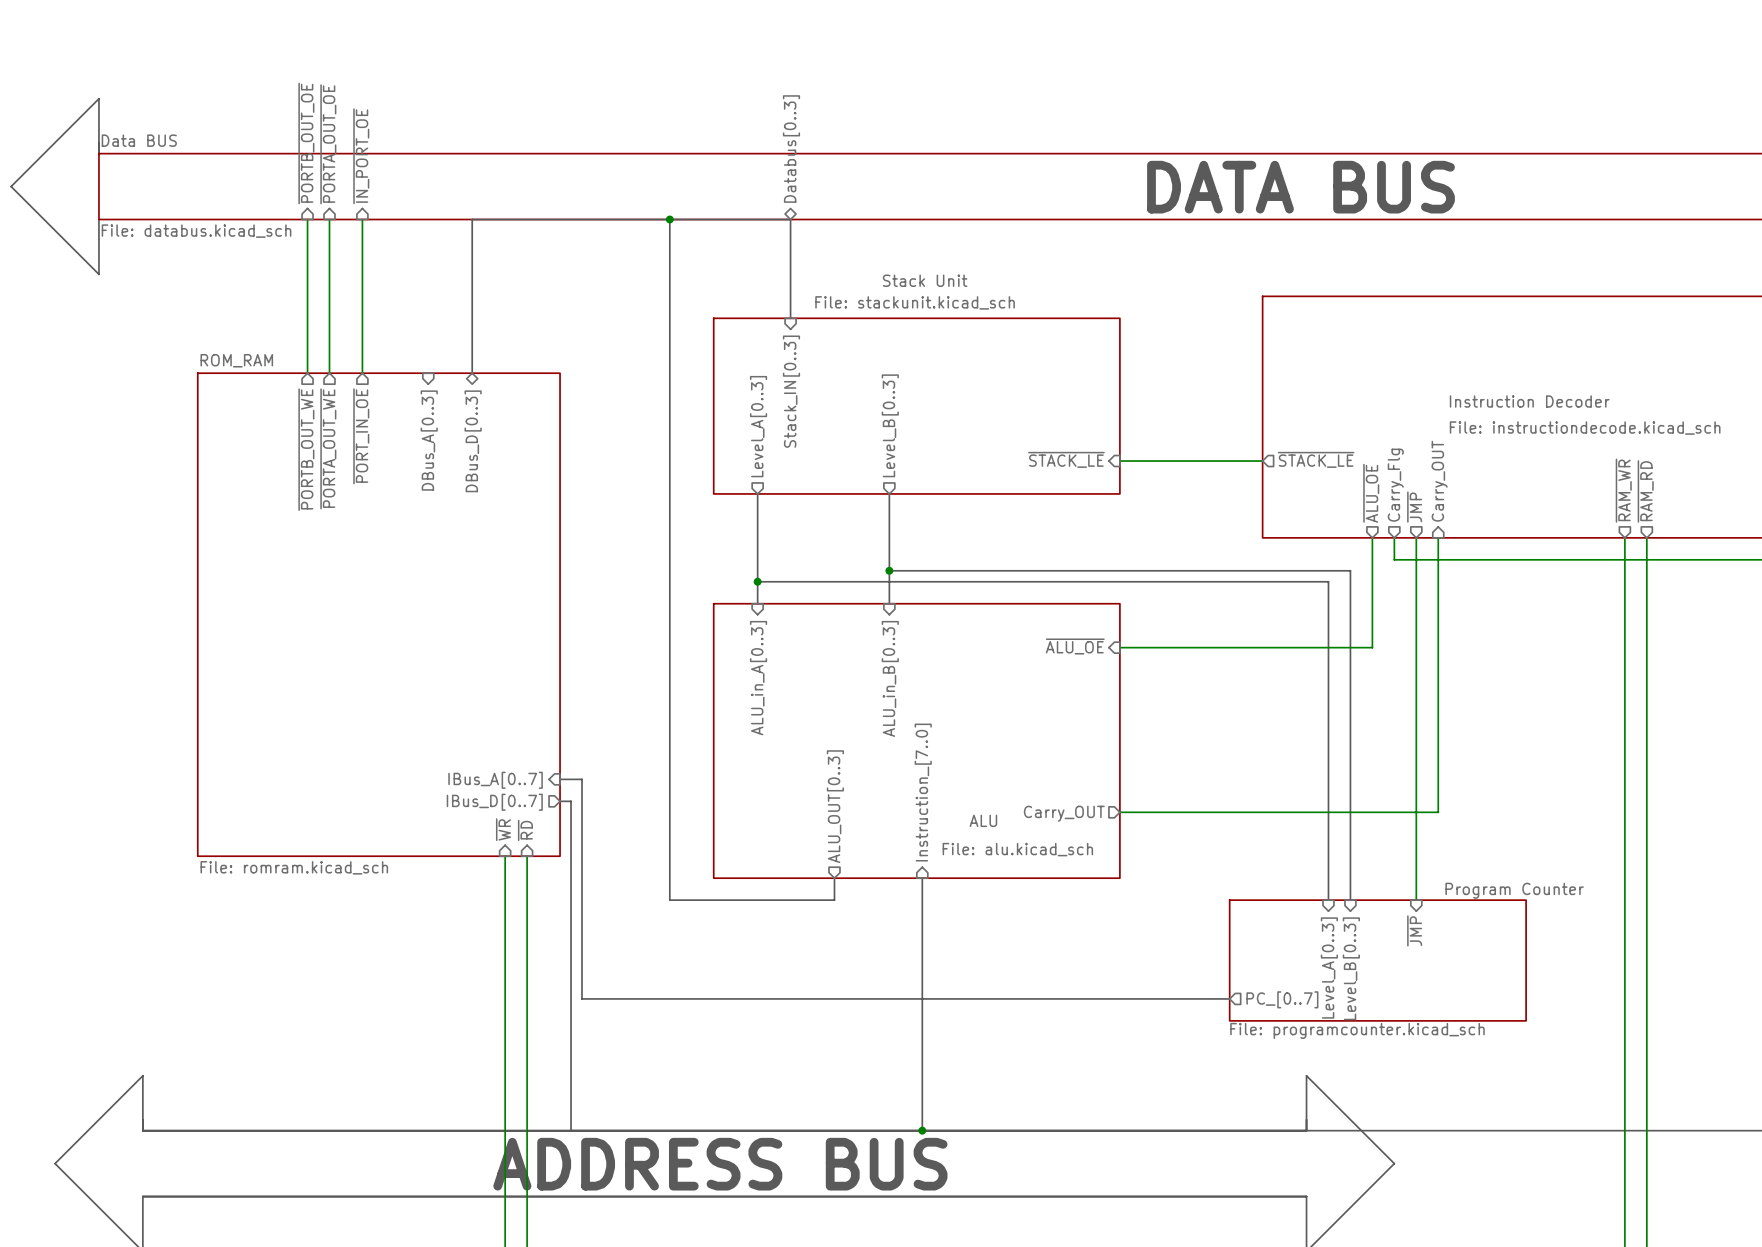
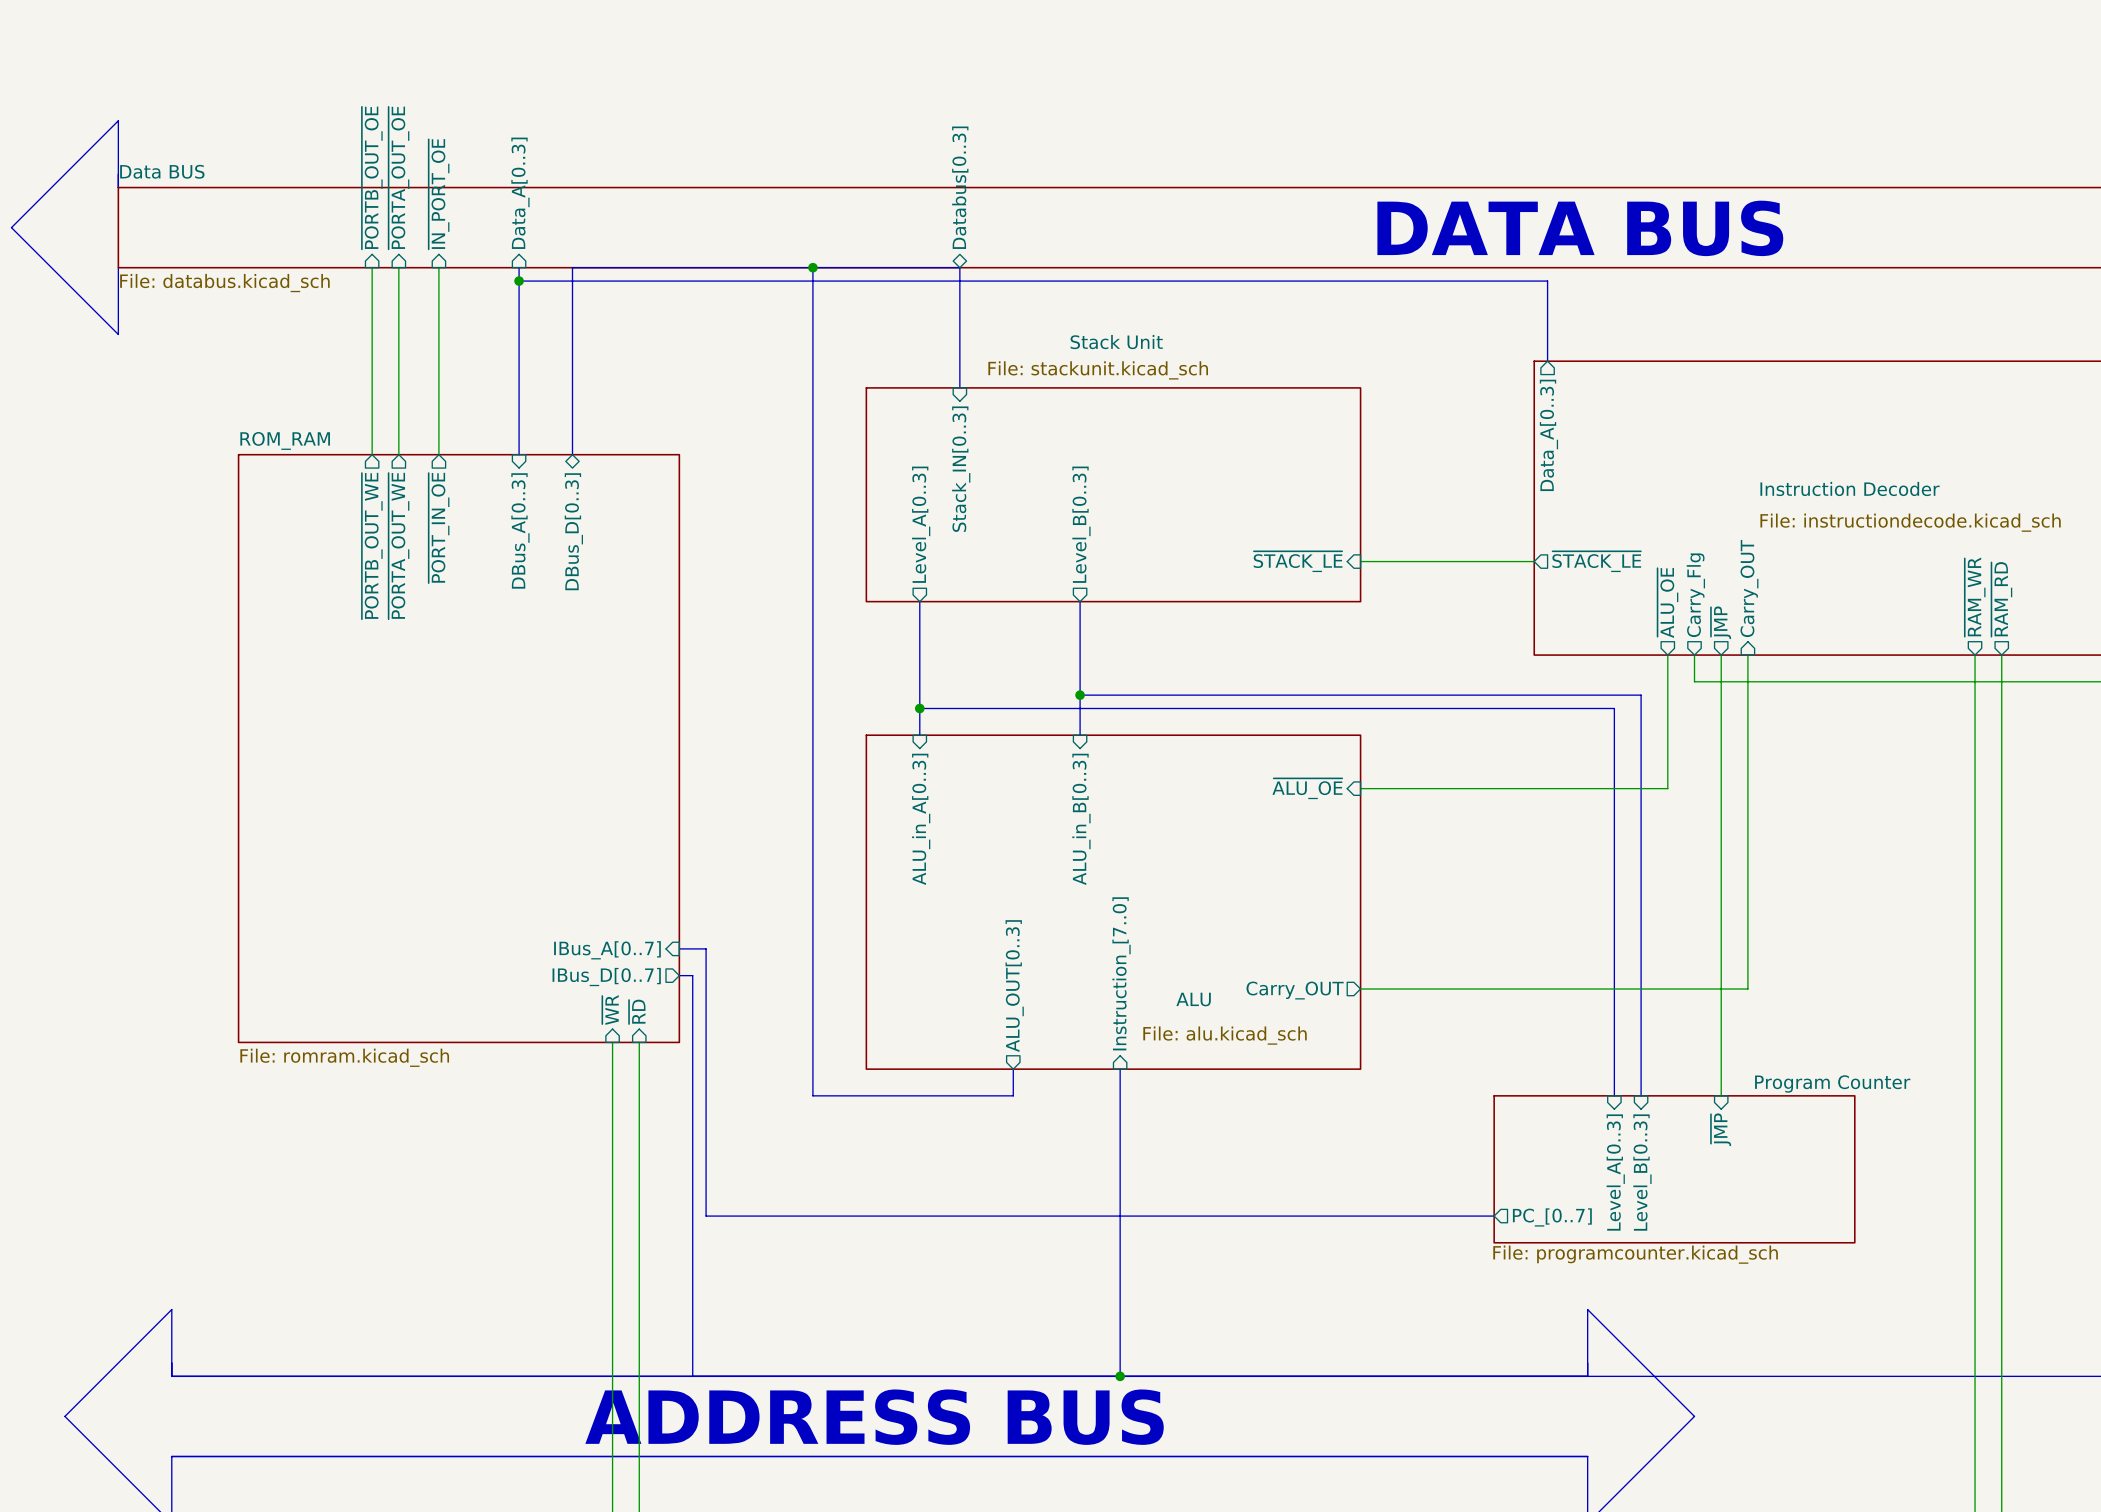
sheet pin: none -> Data_A[0..3] (520, 193)
bus: none -> (519, 267) (519, 454)
bus: none -> (519, 281) (1547, 281) (1547, 361)
junction: none -> (519, 281)
sheet pin: none -> Data_A[0..3] (1548, 435)

